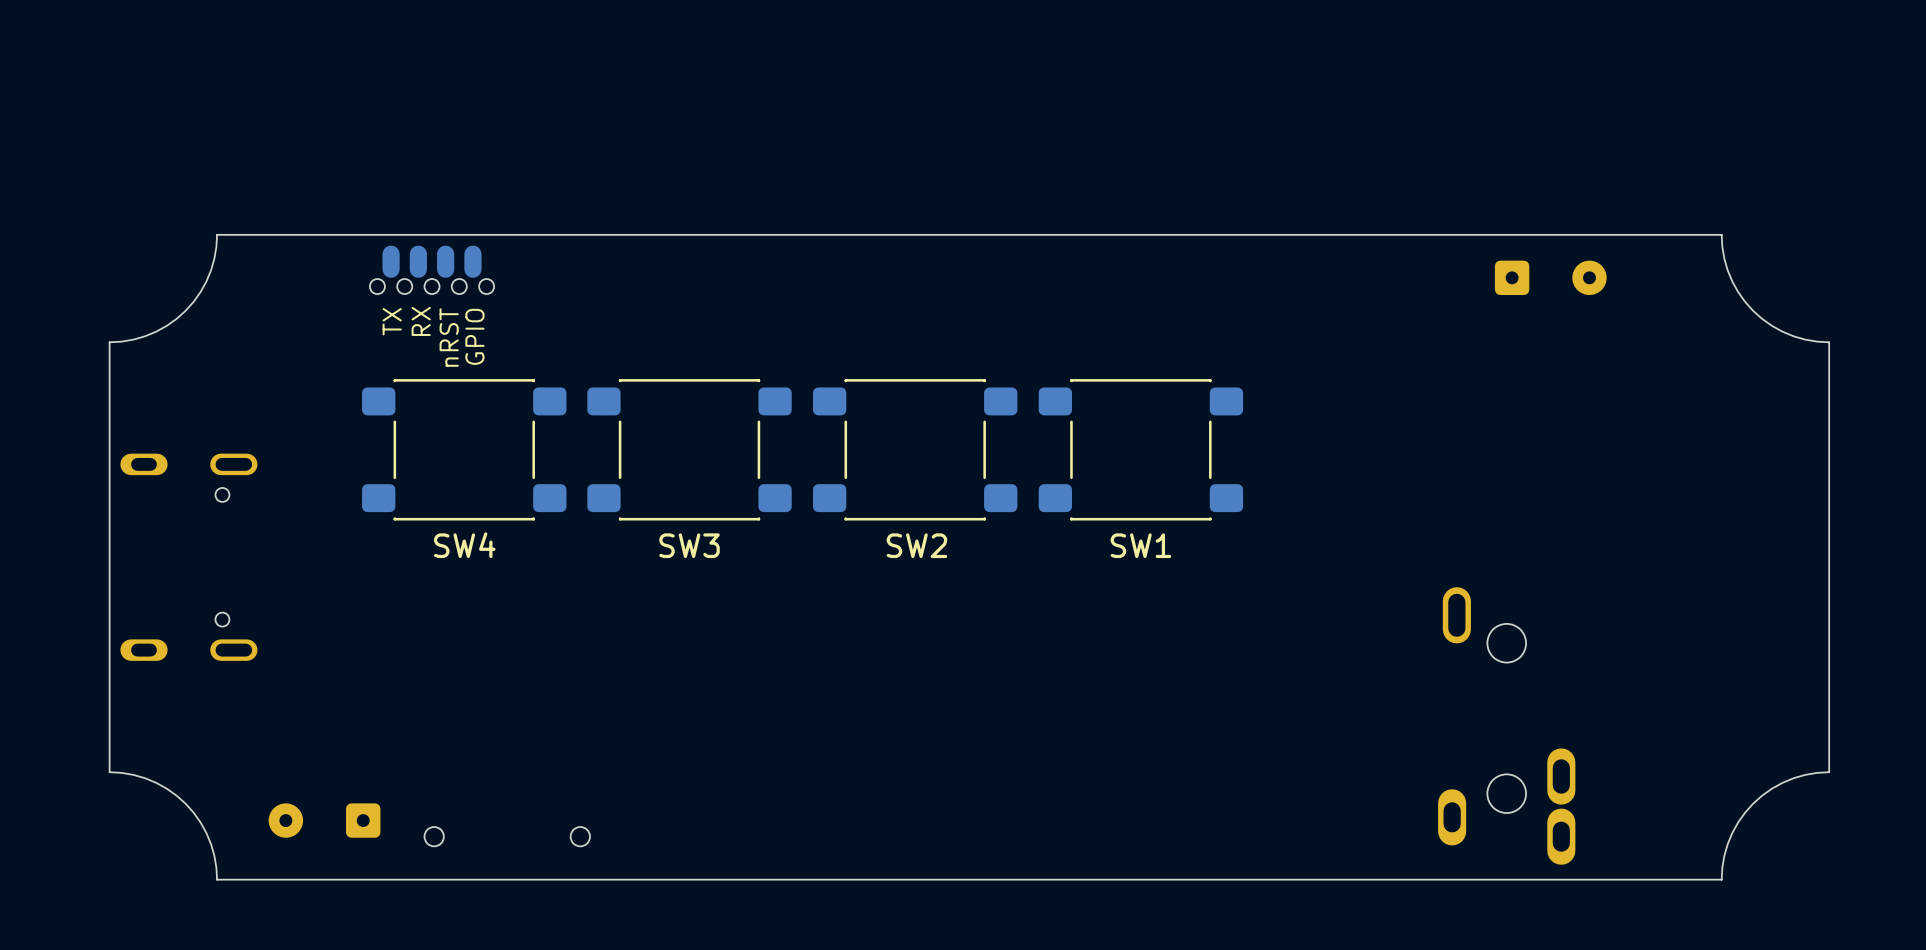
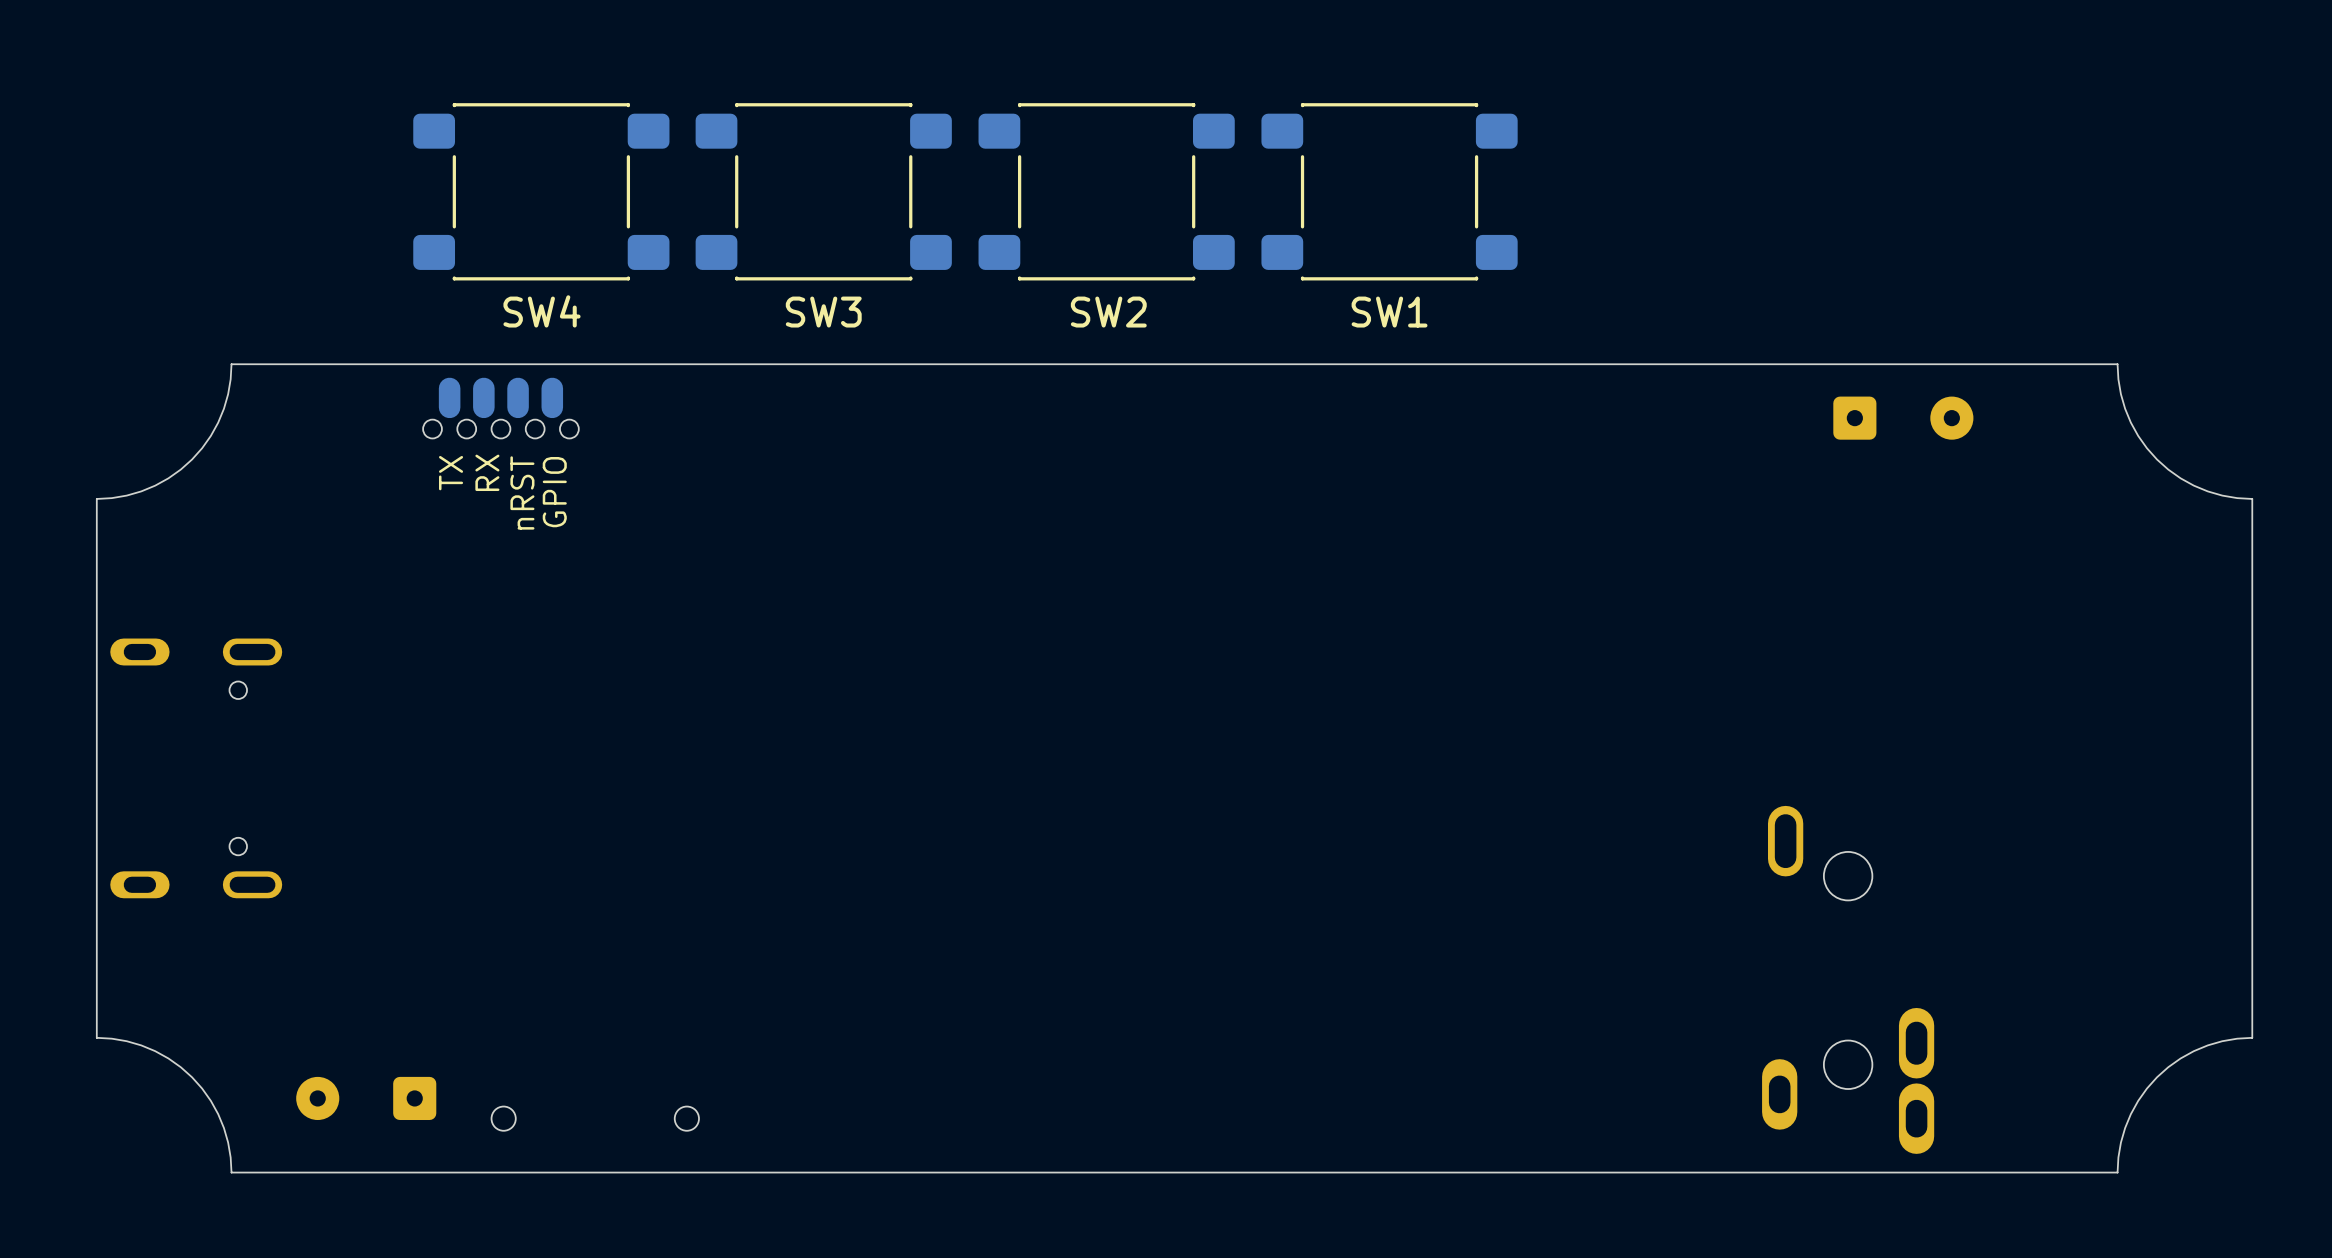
SW4 position: (464, 449) -> (541, 191)
SW3 position: (689, 449) -> (823, 191)
SW2 position: (915, 449) -> (1106, 191)
SW1 position: (1140, 449) -> (1389, 191)

